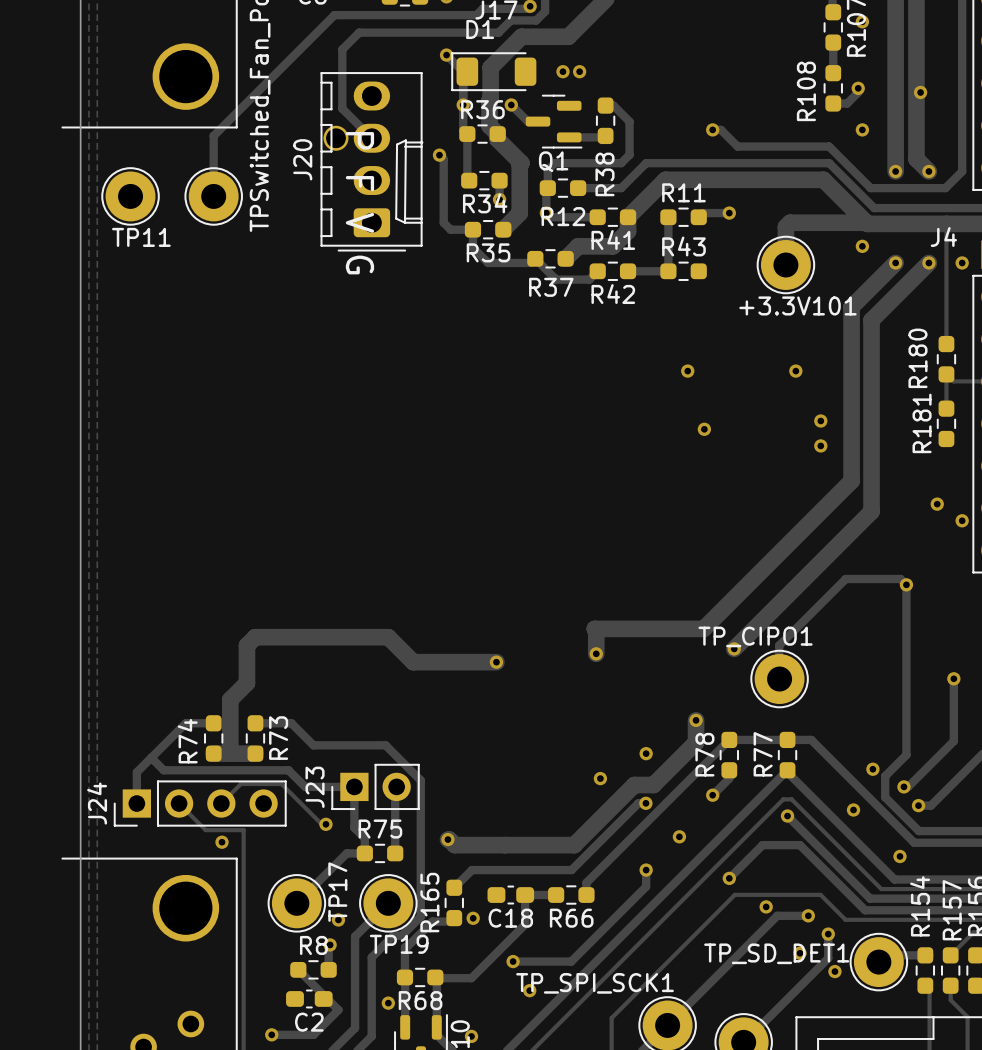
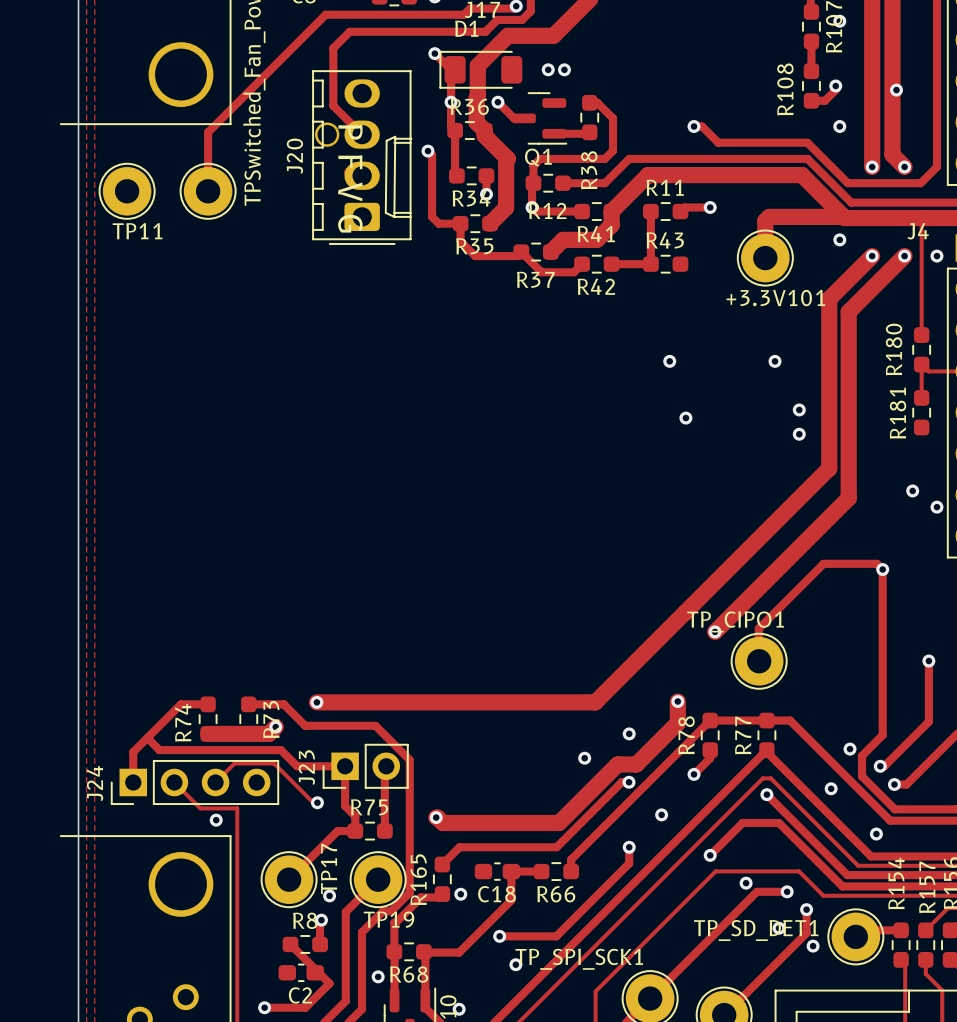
track: (703, 628) (594, 628) (596, 653) -> (685, 612) (595, 702) (316, 702)
via: (596, 653) -> none
track: (496, 662) (413, 662) (388, 637) (255, 637) (246, 645) (246, 683) (230, 699) (230, 753) -> none
via: (496, 662) -> none
via: none -> (316, 702)
track: none -> (275, 727) (268, 733) (248, 733)
via: none -> (275, 727)

